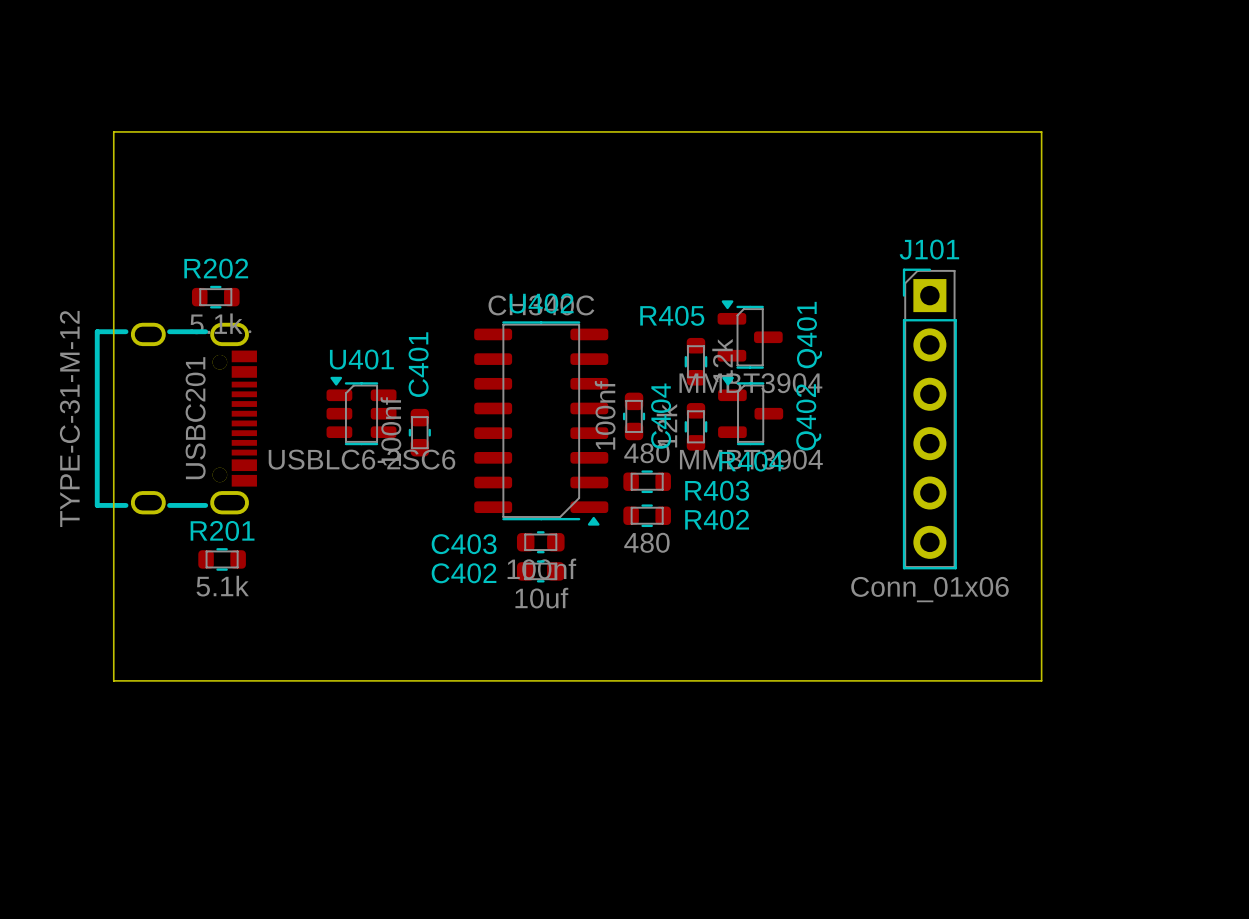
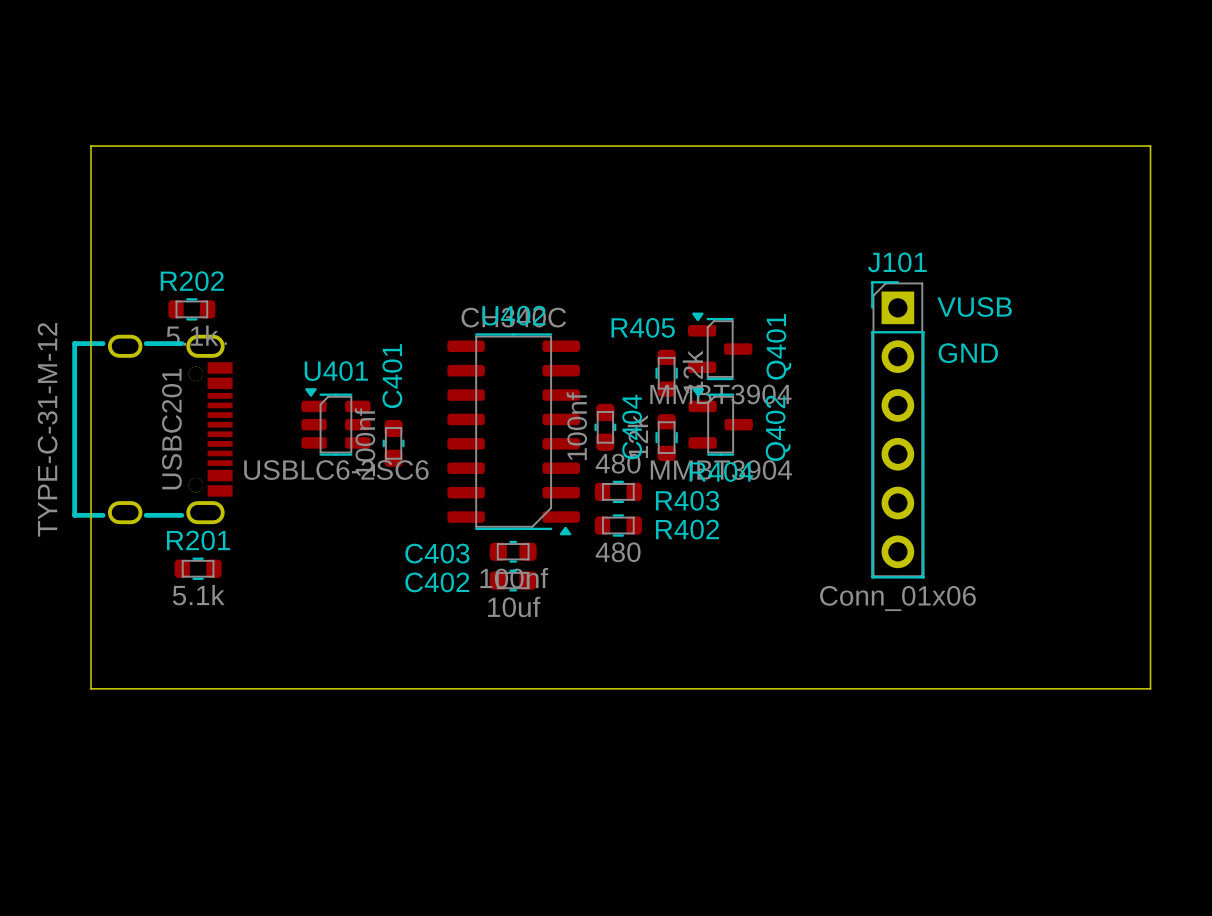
board edge: (1041, 131) (1041, 680) -> (1008, 146) (1150, 146) (1150, 688) (1008, 688)
text: none -> VUSB (974, 307)
text: none -> GND (968, 353)

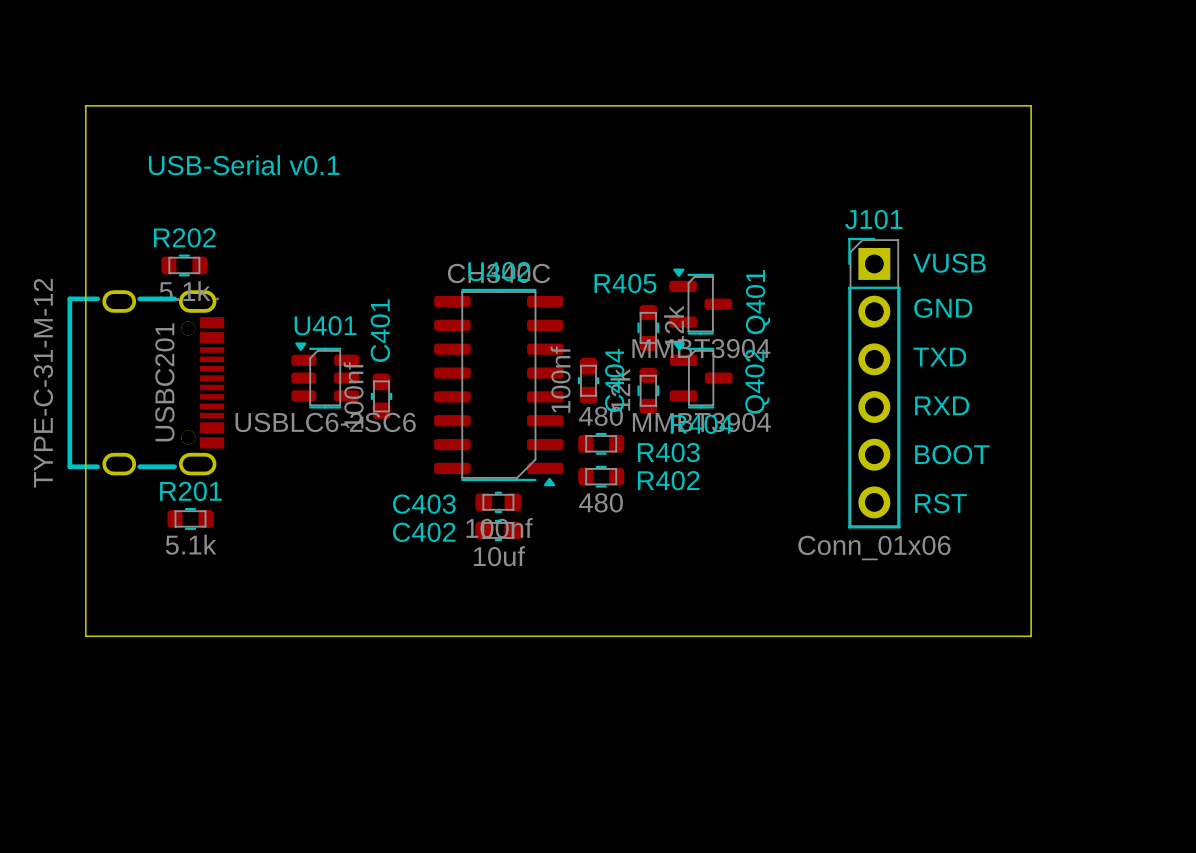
board edge: (1058, 146) (1150, 146) (1150, 688) (1058, 688) -> (1031, 105) (1031, 636)
text: none -> USB-Serial v0.1 (244, 165)
text: none -> TXD (939, 357)
text: none -> RXD (942, 405)
text: none -> BOOT (952, 454)
text: none -> RST (940, 503)

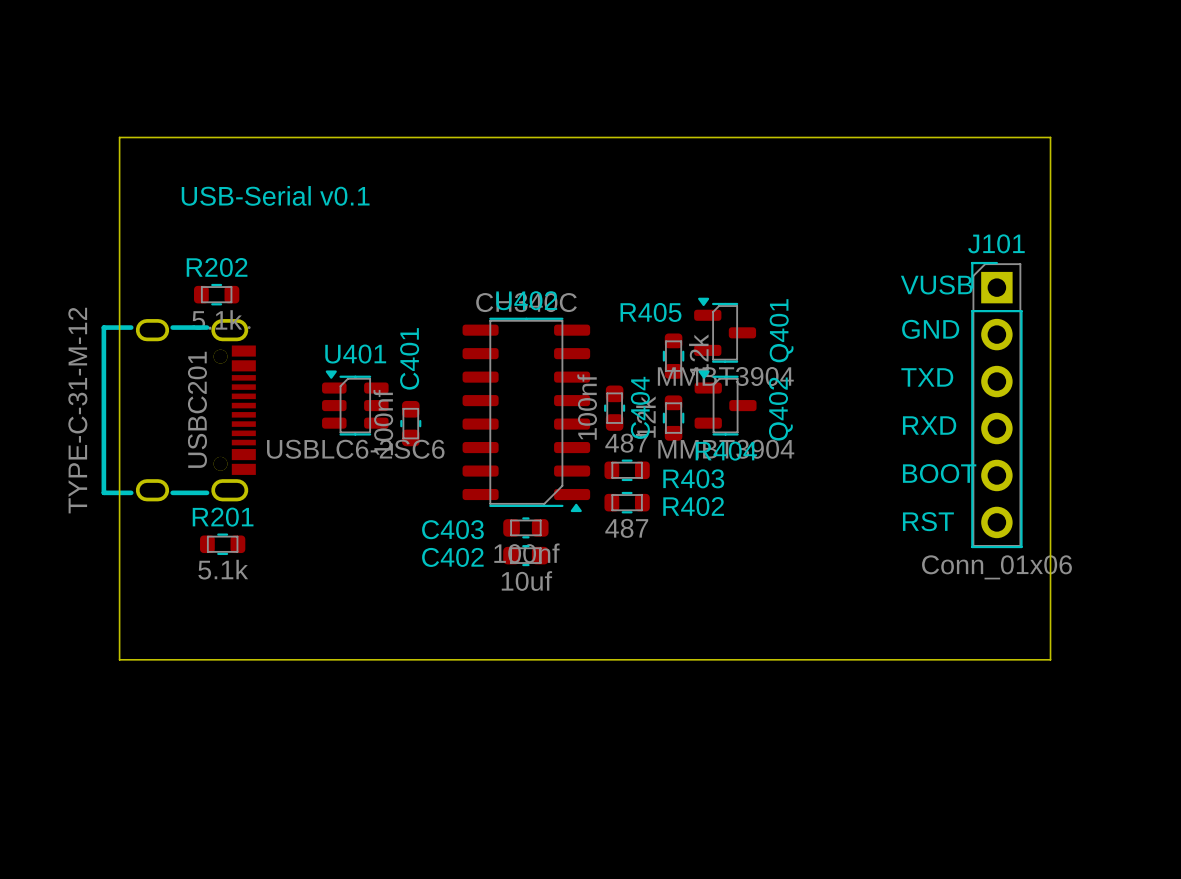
text position: VUSB (949, 263) -> VUSB (936, 284)
text position: GND (943, 308) -> GND (930, 329)
text position: TXD (939, 357) -> TXD (927, 377)
J101 position: (874, 383) -> (996, 405)
text position: RXD (942, 405) -> RXD (929, 425)
R403 value: 480 (600, 416) -> 487 (626, 443)
text position: BOOT (952, 454) -> BOOT (939, 473)
R402 value: 480 (600, 502) -> 487 (626, 528)
text position: RST (940, 503) -> RST (928, 521)

